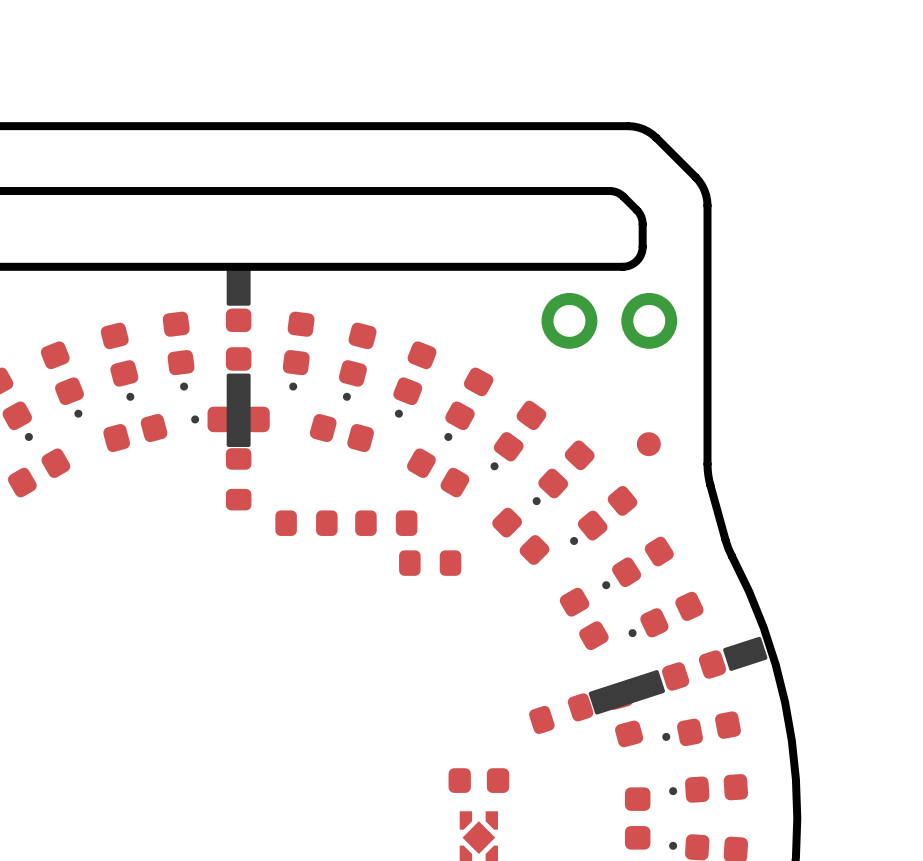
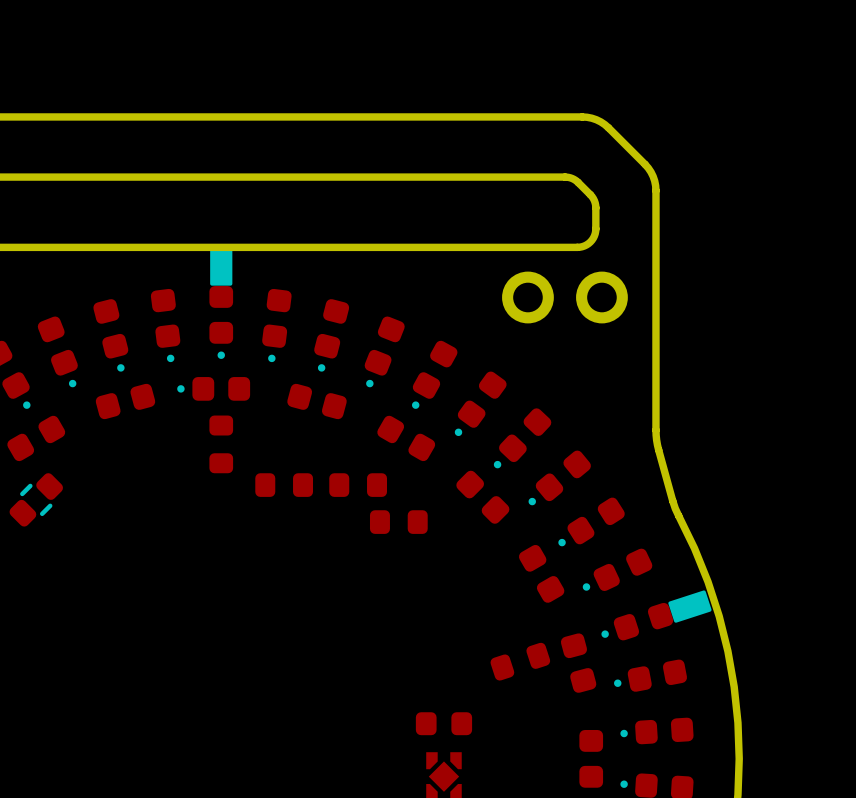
part footprint: [225, 265, 252, 447] -> [209, 246, 234, 359]
part: (648, 444) -> none
part: none -> (36, 499)
part footprint: [588, 636, 768, 715] -> [601, 590, 712, 641]

